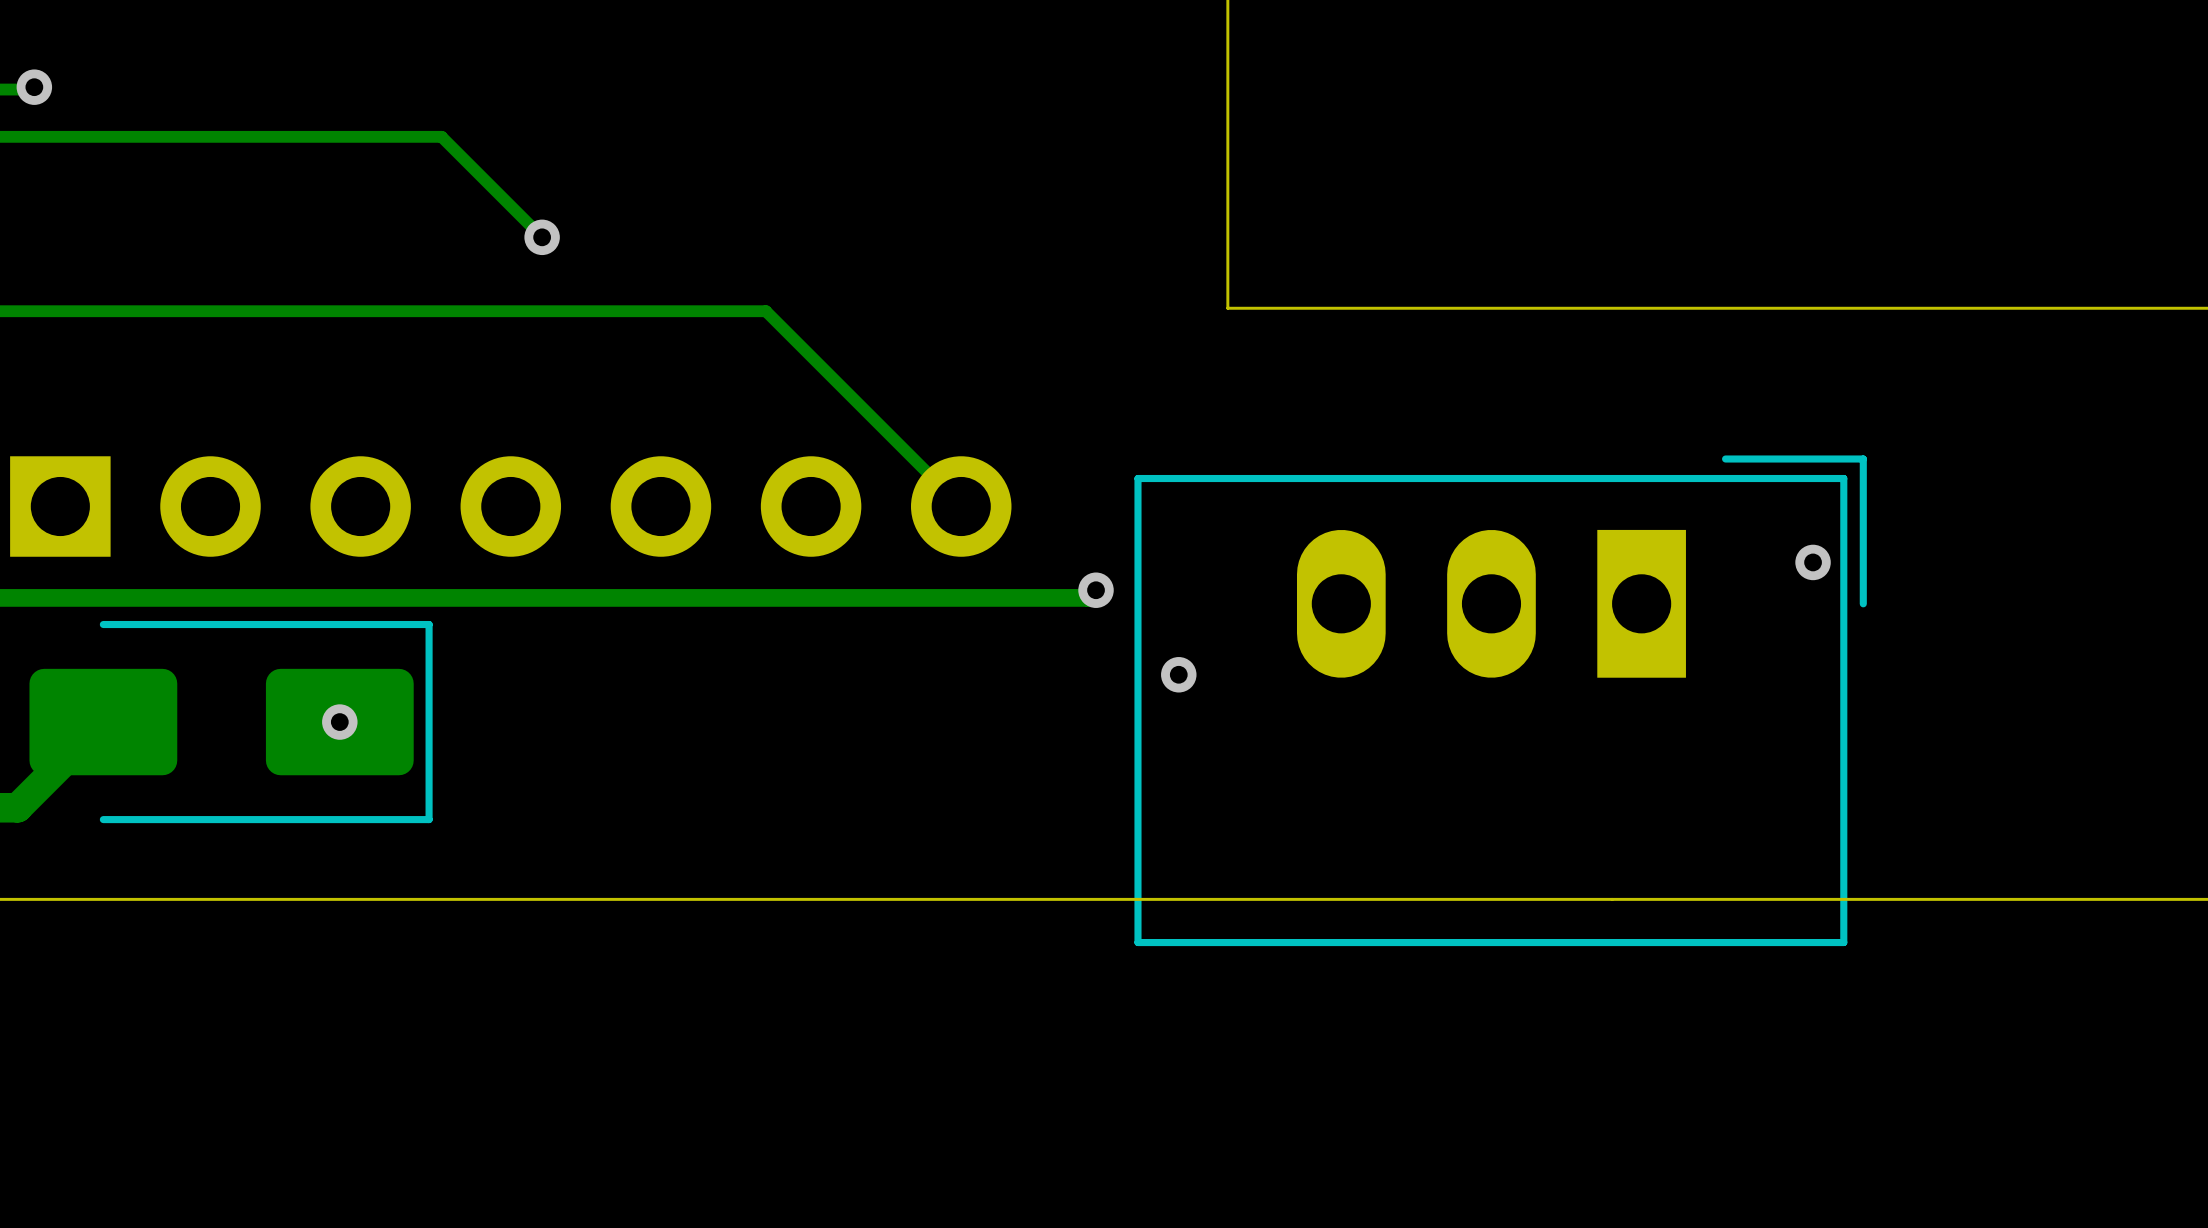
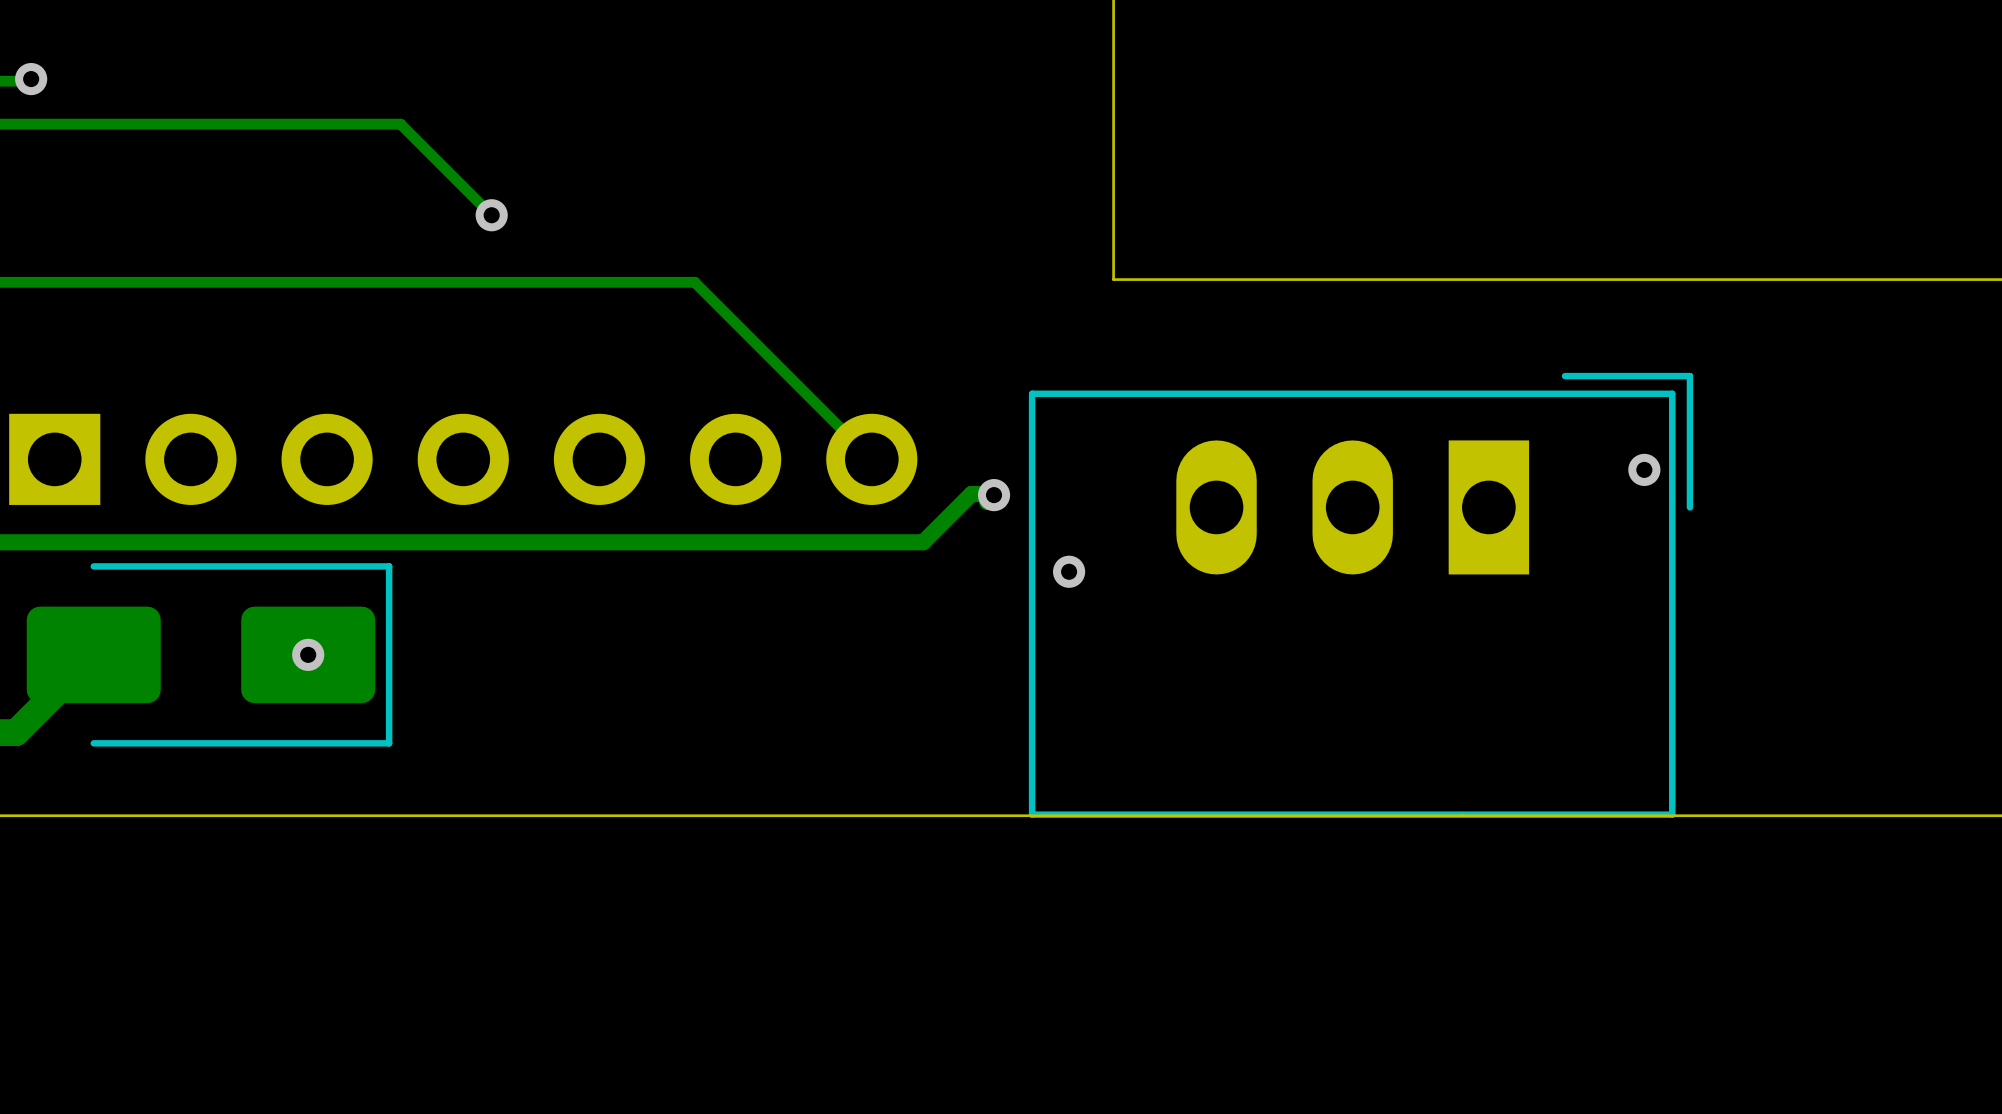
via position: (1813, 562) -> (1644, 469)
track: (1096, 590) (1088, 597) (1017, 597) -> (987, 502) (994, 495) (971, 494) (923, 542)
via position: (1096, 590) -> (994, 495)
via position: (1178, 674) -> (1069, 571)
part position: (1500, 700) -> (1361, 595)

